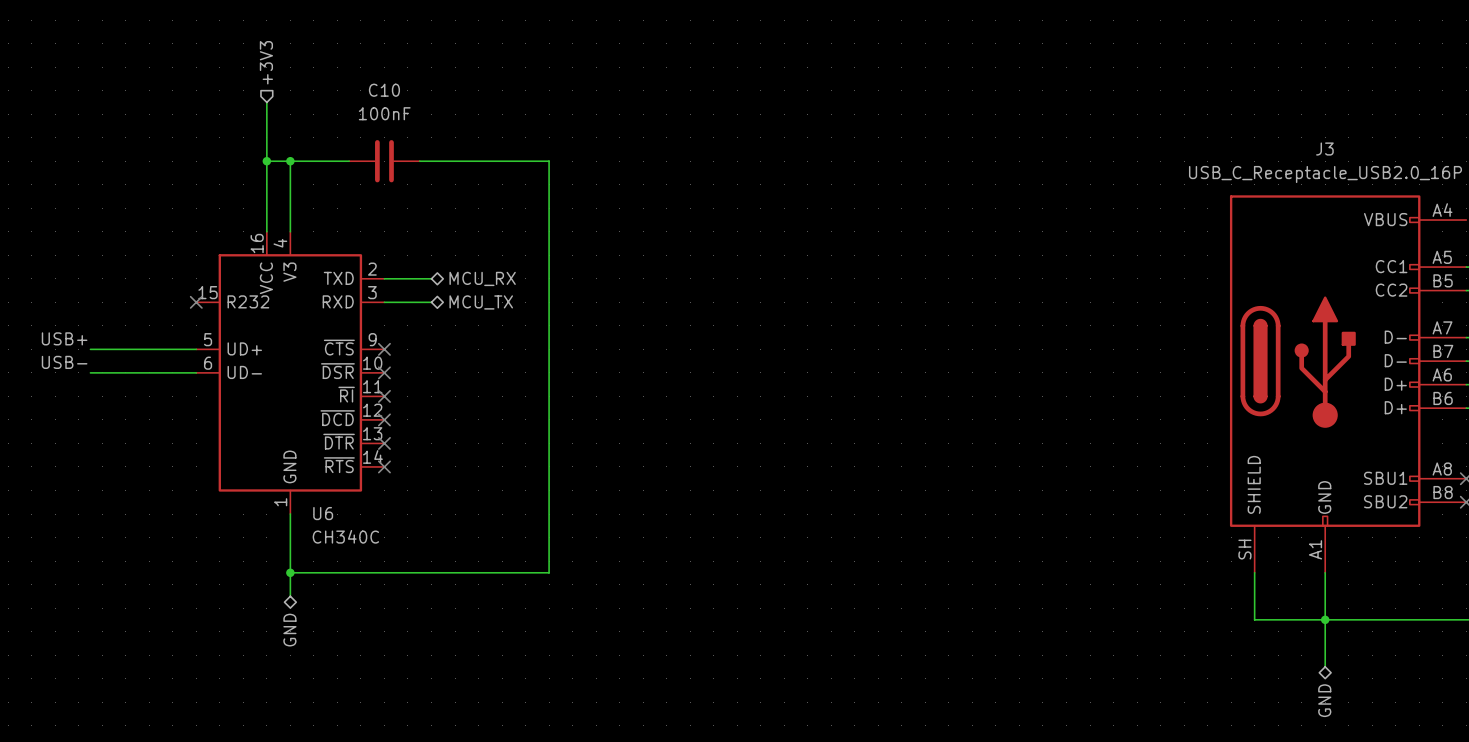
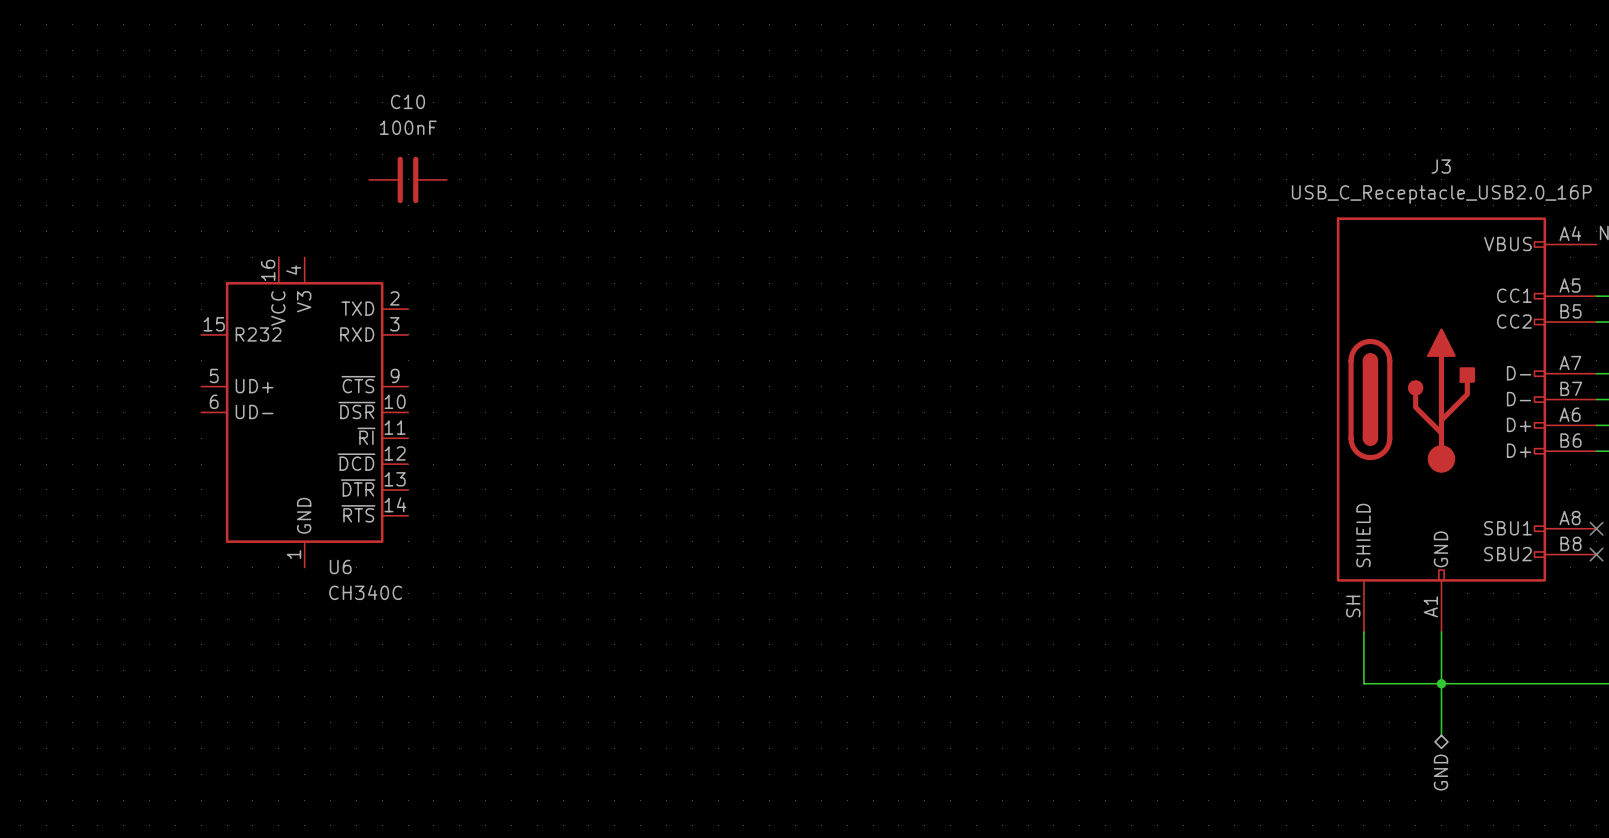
hierarchical label: +3V3 (266, 62) -> none
wire: (266, 102) (266, 231) -> none
wire: (266, 161) (349, 161) -> none
junction: (266, 161) -> none
wire: (290, 161) (290, 231) -> none
junction: (290, 161) -> none
wire: (419, 161) (549, 161) (549, 572) (290, 572) -> none
wire: (384, 278) (431, 278) -> none
hierarchical label: MCU_RX (482, 278) -> none
no-connect mark: (196, 302) -> none
wire: (384, 302) (431, 302) -> none
hierarchical label: MCU_TX (481, 302) -> none
label: USB+ (64, 338) -> none
wire: (90, 349) (196, 349) -> none
no-connect mark: (384, 349) -> none
label: USB- (64, 362) -> none
wire: (90, 372) (196, 372) -> none
no-connect mark: (384, 372) -> none
no-connect mark: (384, 396) -> none
no-connect mark: (384, 419) -> none
no-connect mark: (384, 443) -> none
no-connect mark: (384, 466) -> none
wire: (290, 514) (290, 596) -> none
junction: (290, 572) -> none
hierarchical label: GND (289, 630) -> none

